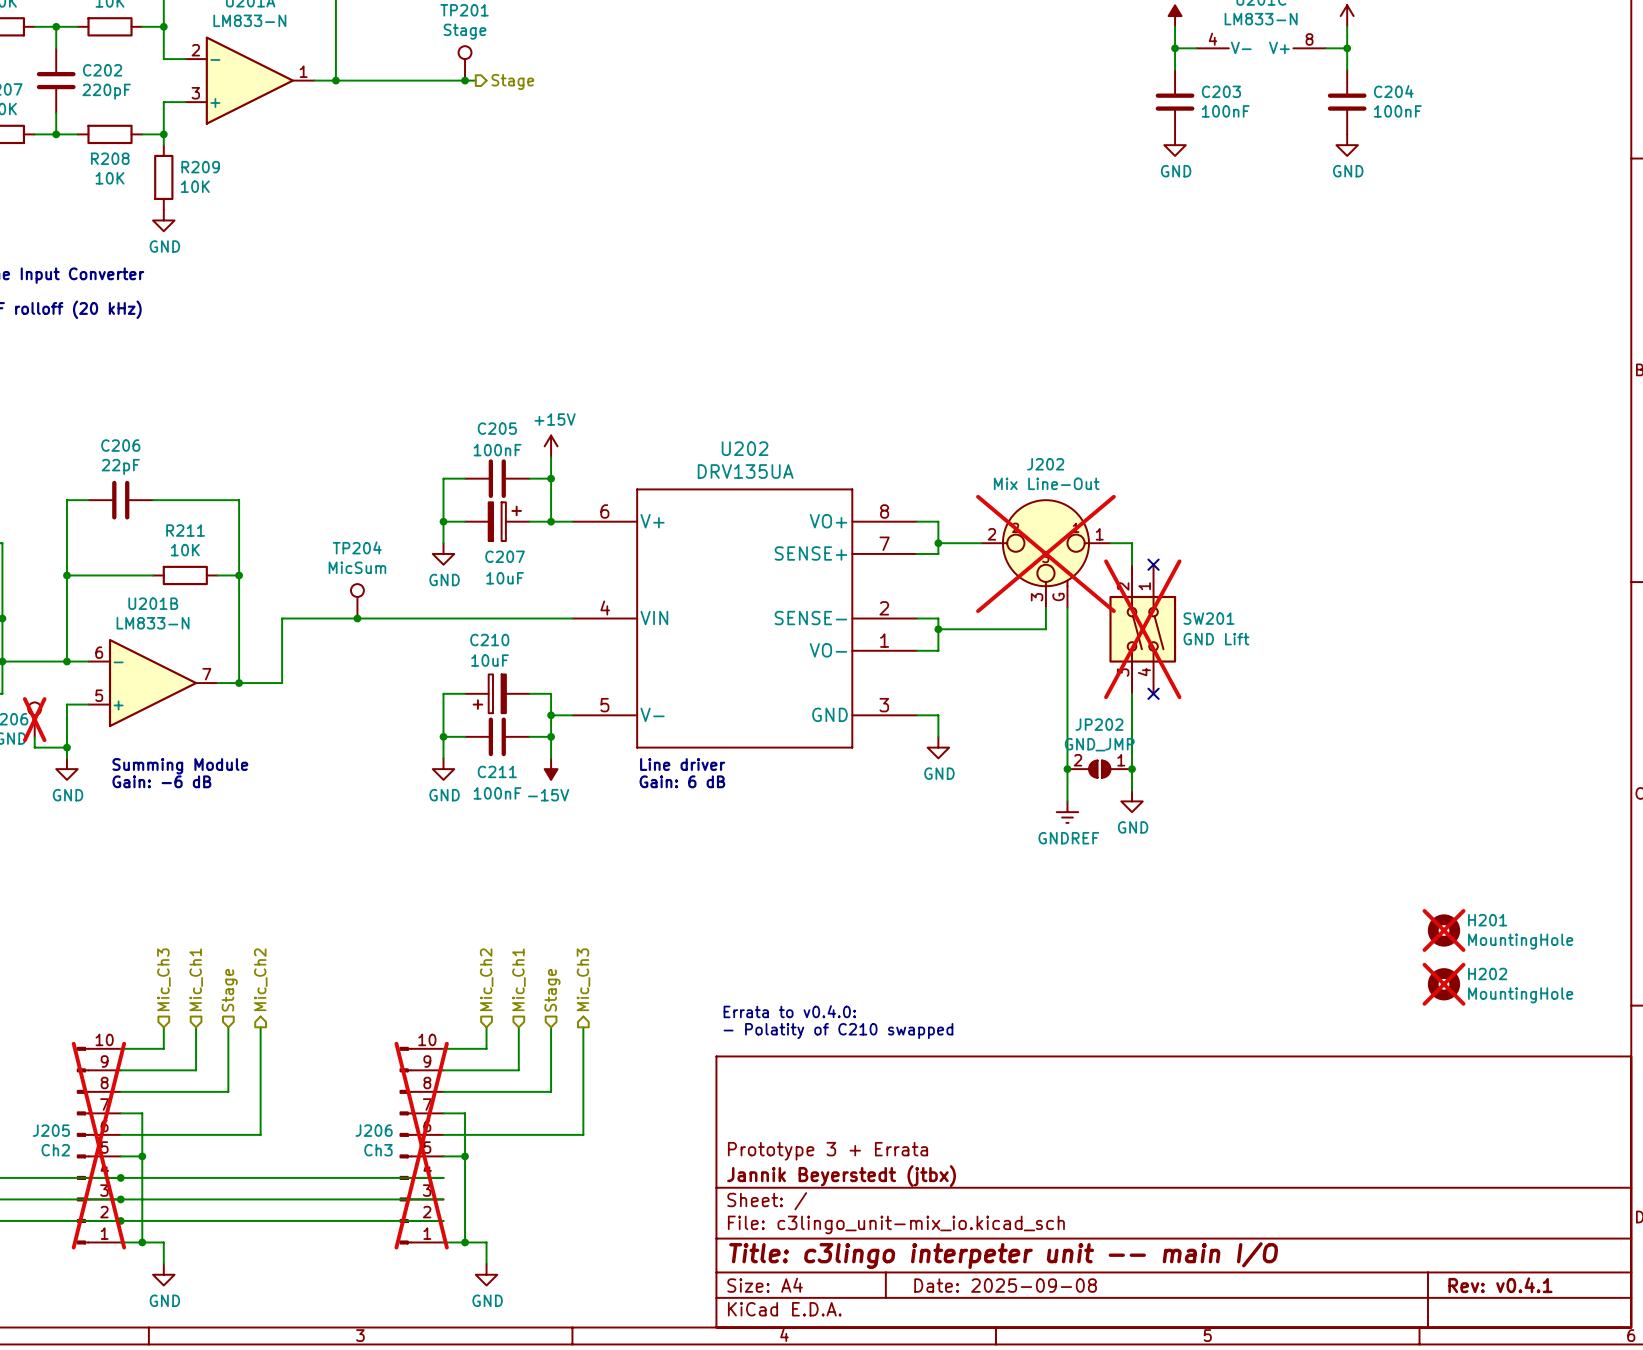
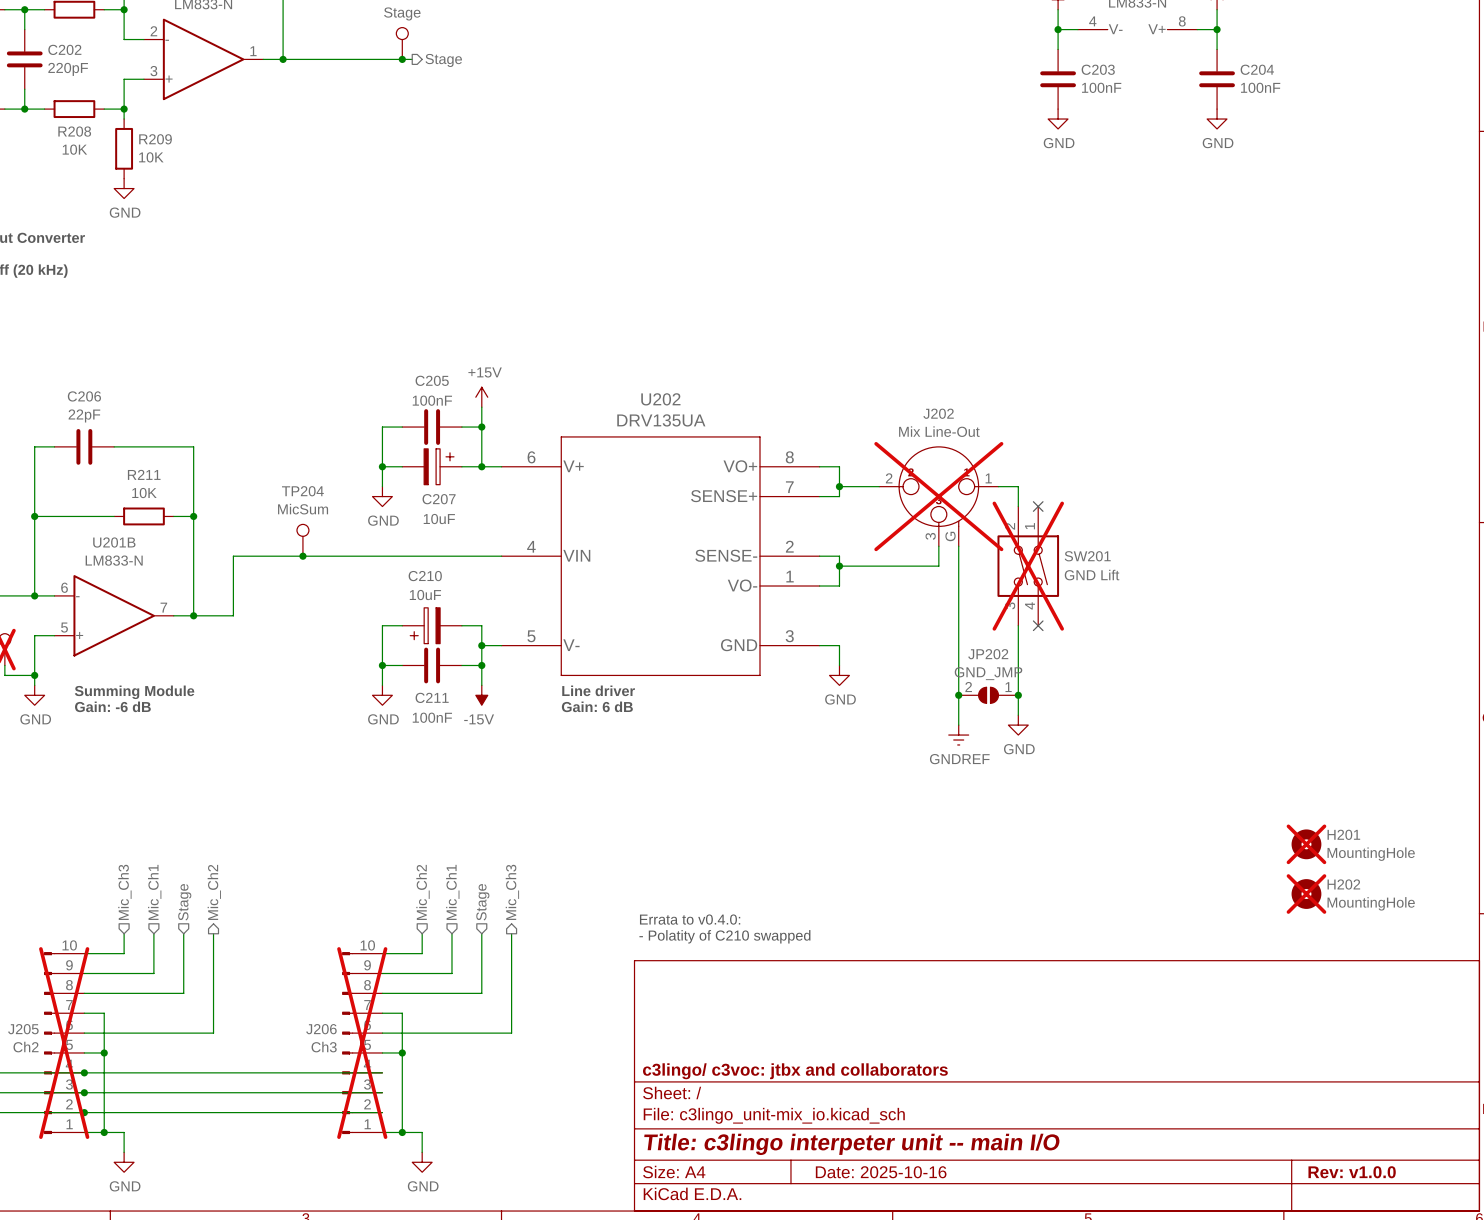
title block: Prototype 3 + Errata (828, 1151) -> none
title block: Jannik Beyerstedt (jtbx) (841, 1176) -> c3lingo/ c3voc: jtbx and collaborators (795, 1071)
title block: Date: 2025-09-08 (1005, 1285) -> Date: 2025-10-16 (881, 1172)
title block: Rev: v0.4.1 (1500, 1285) -> Rev: v1.0.0 (1352, 1172)

